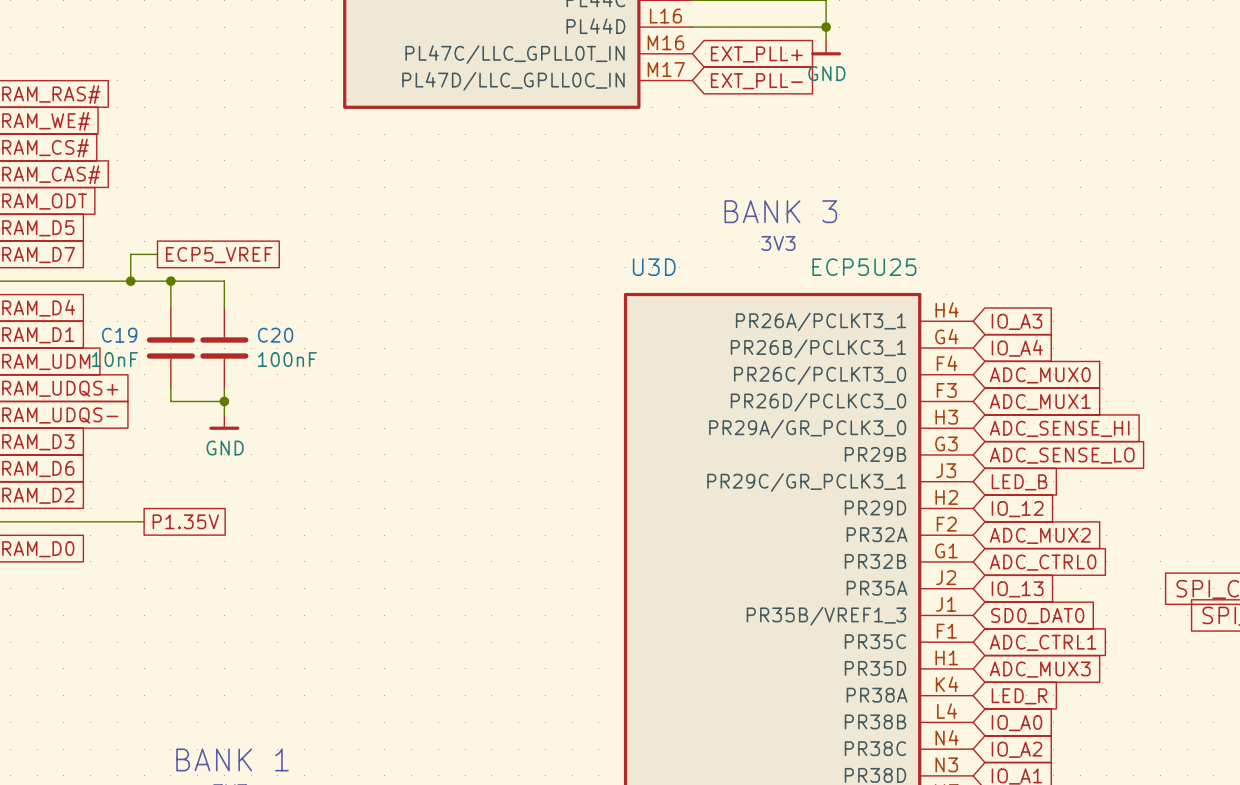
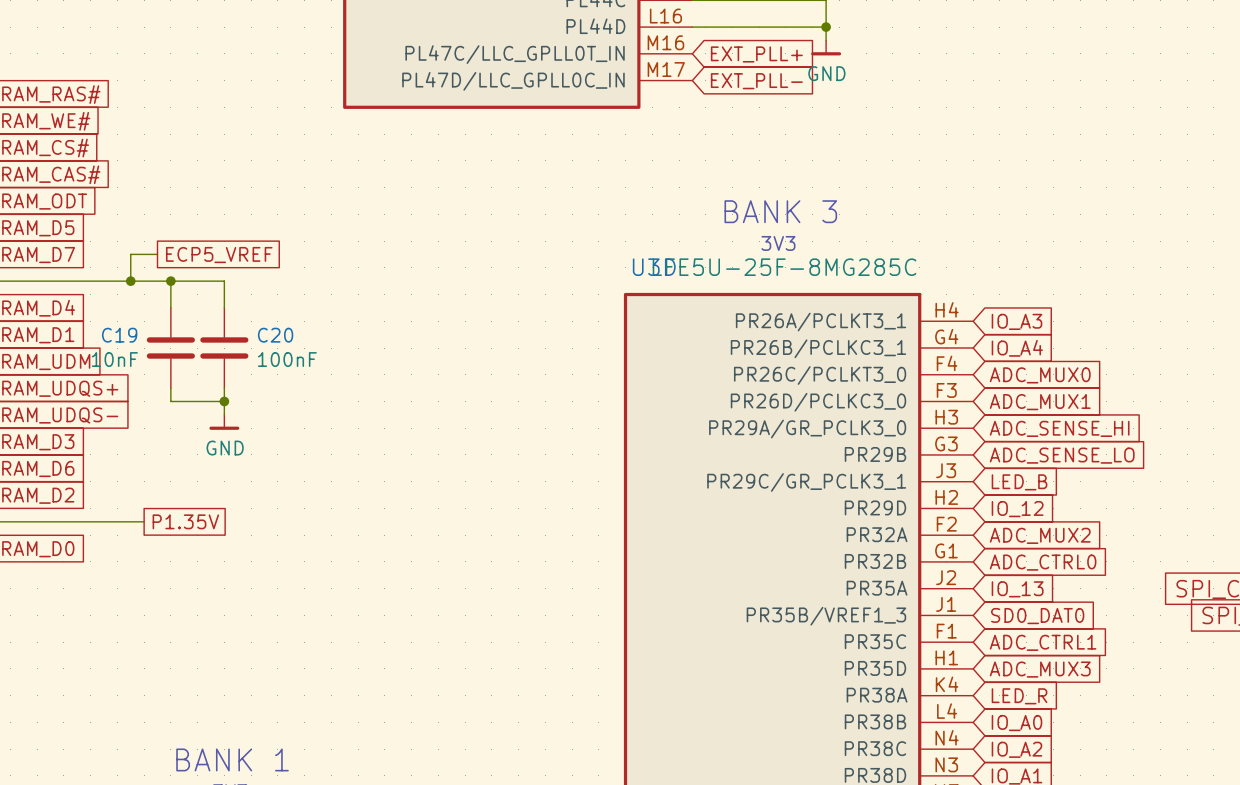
U3D value: ECP5U25 (864, 267) -> LFE5U-25F-8MG285C (784, 267)

